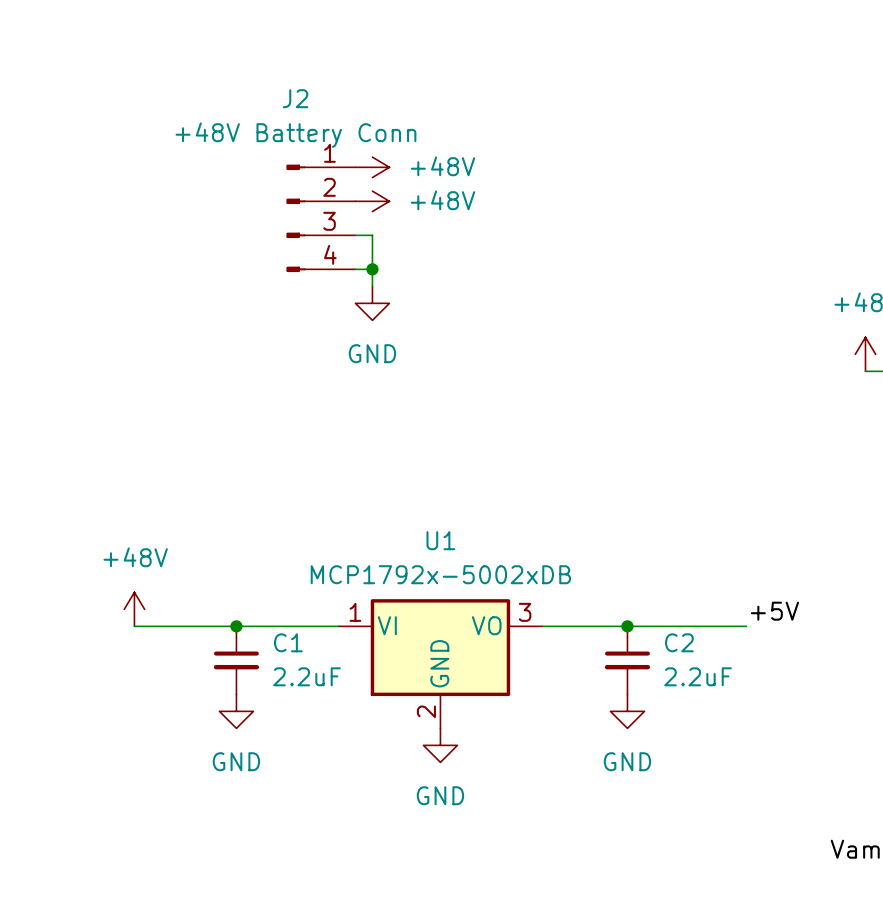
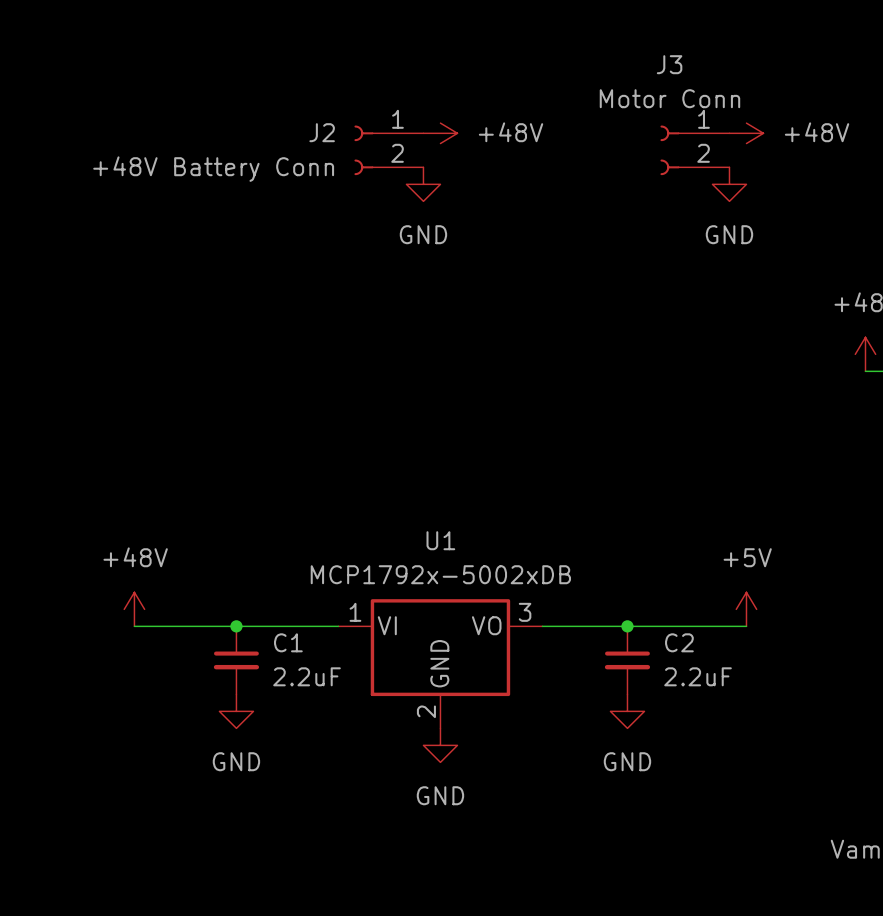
J2 name position: J2 (295, 98) -> J2 (322, 132)
power symbol: none -> +48V (440, 133)
power symbol: none -> +48V (746, 133)
J2 value position: +48V Battery Conn (295, 135) -> +48V Battery Conn (213, 169)
J3: none -> Motor Conn (694, 150)
J2 symbol: [286, 164, 356, 273] -> [354, 125, 424, 176]
power symbol: +48V (372, 167) -> none
power symbol: none -> GND (729, 184)
power symbol: +48V (372, 201) -> none
wire: (355, 235) (372, 235) (372, 286) -> none
wire: (355, 269) (372, 269) -> none
junction: (372, 269) -> none
power symbol position: GND (372, 303) -> GND (423, 184)
power symbol: none -> +5V (746, 609)
label: +5V (774, 611) -> none

